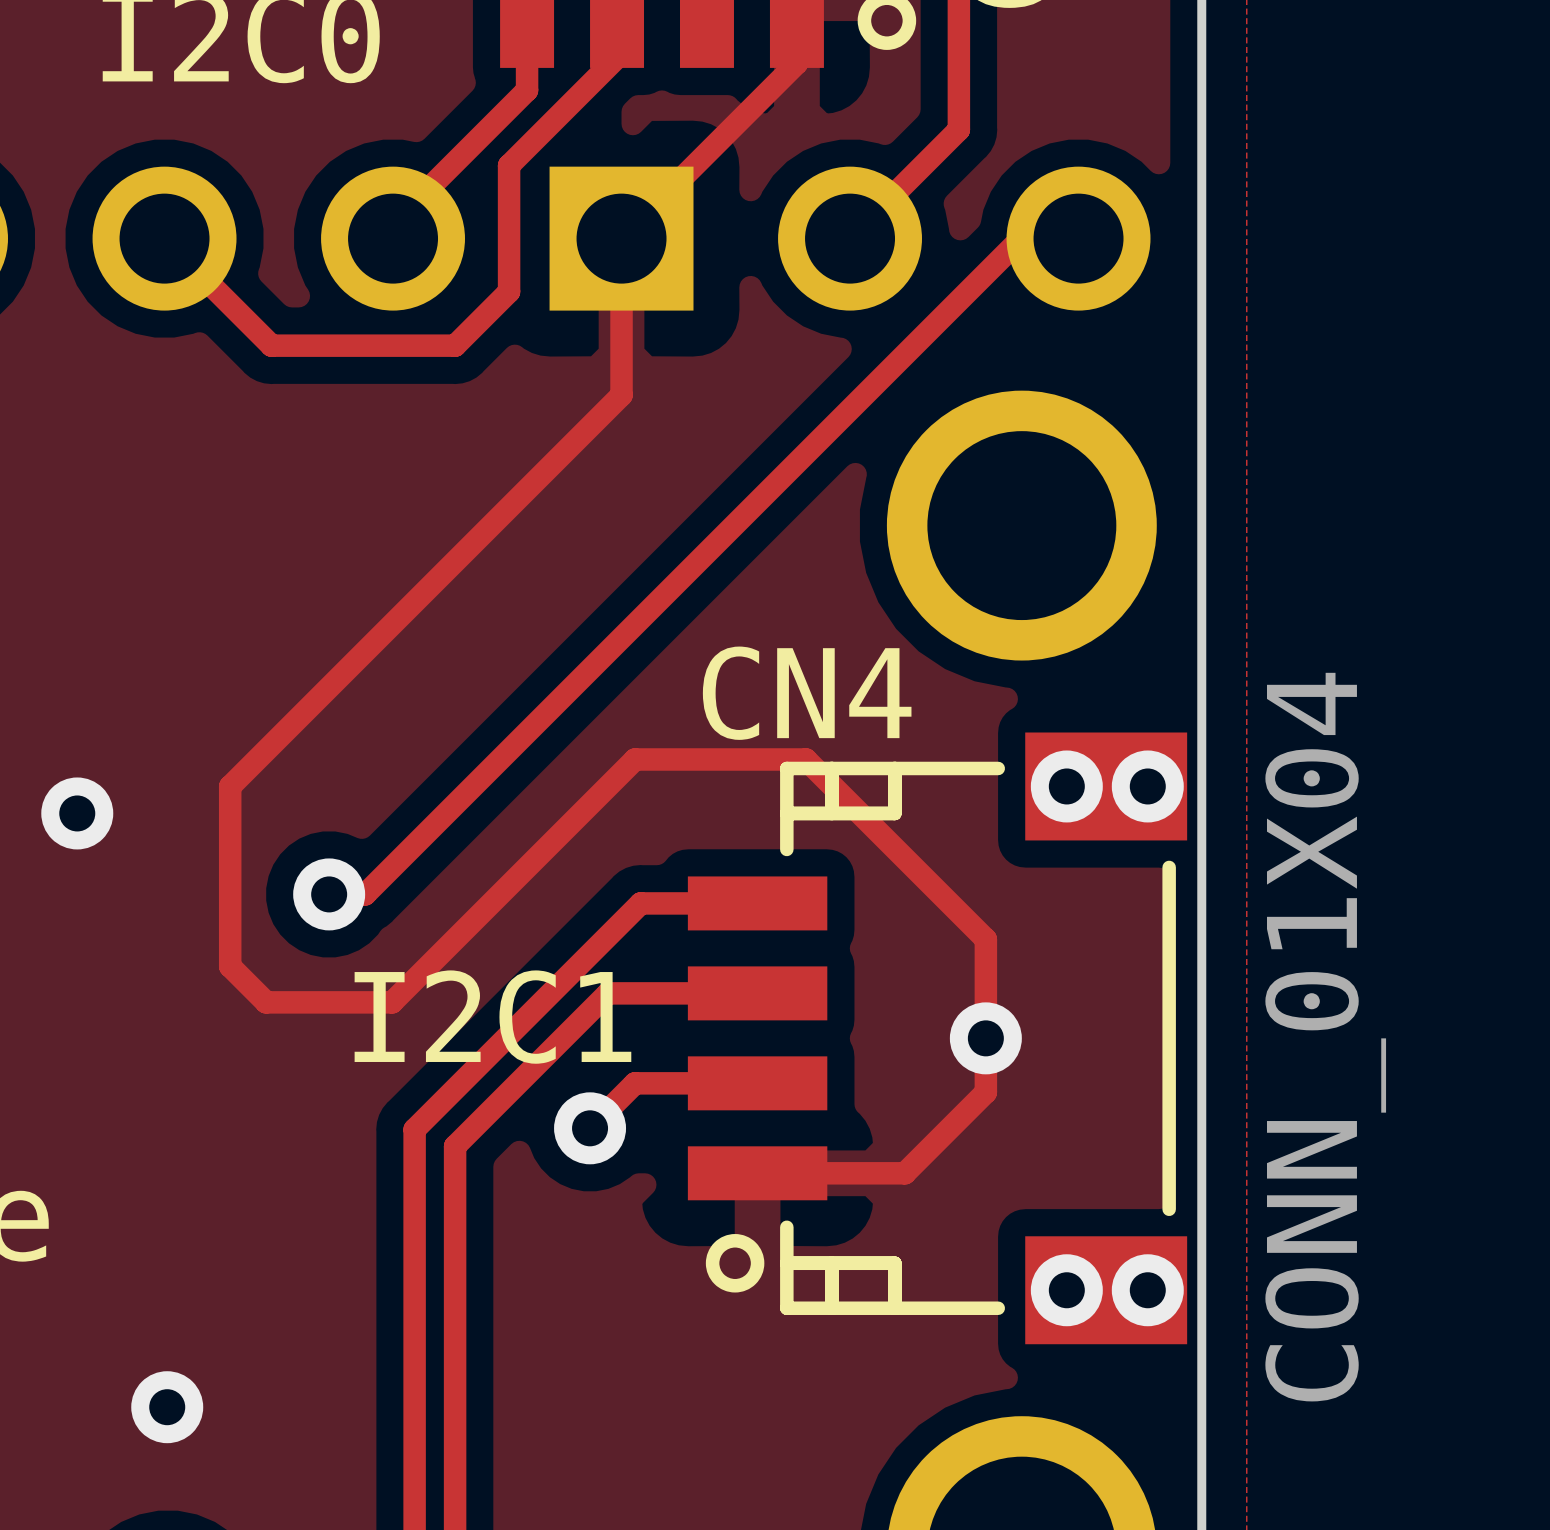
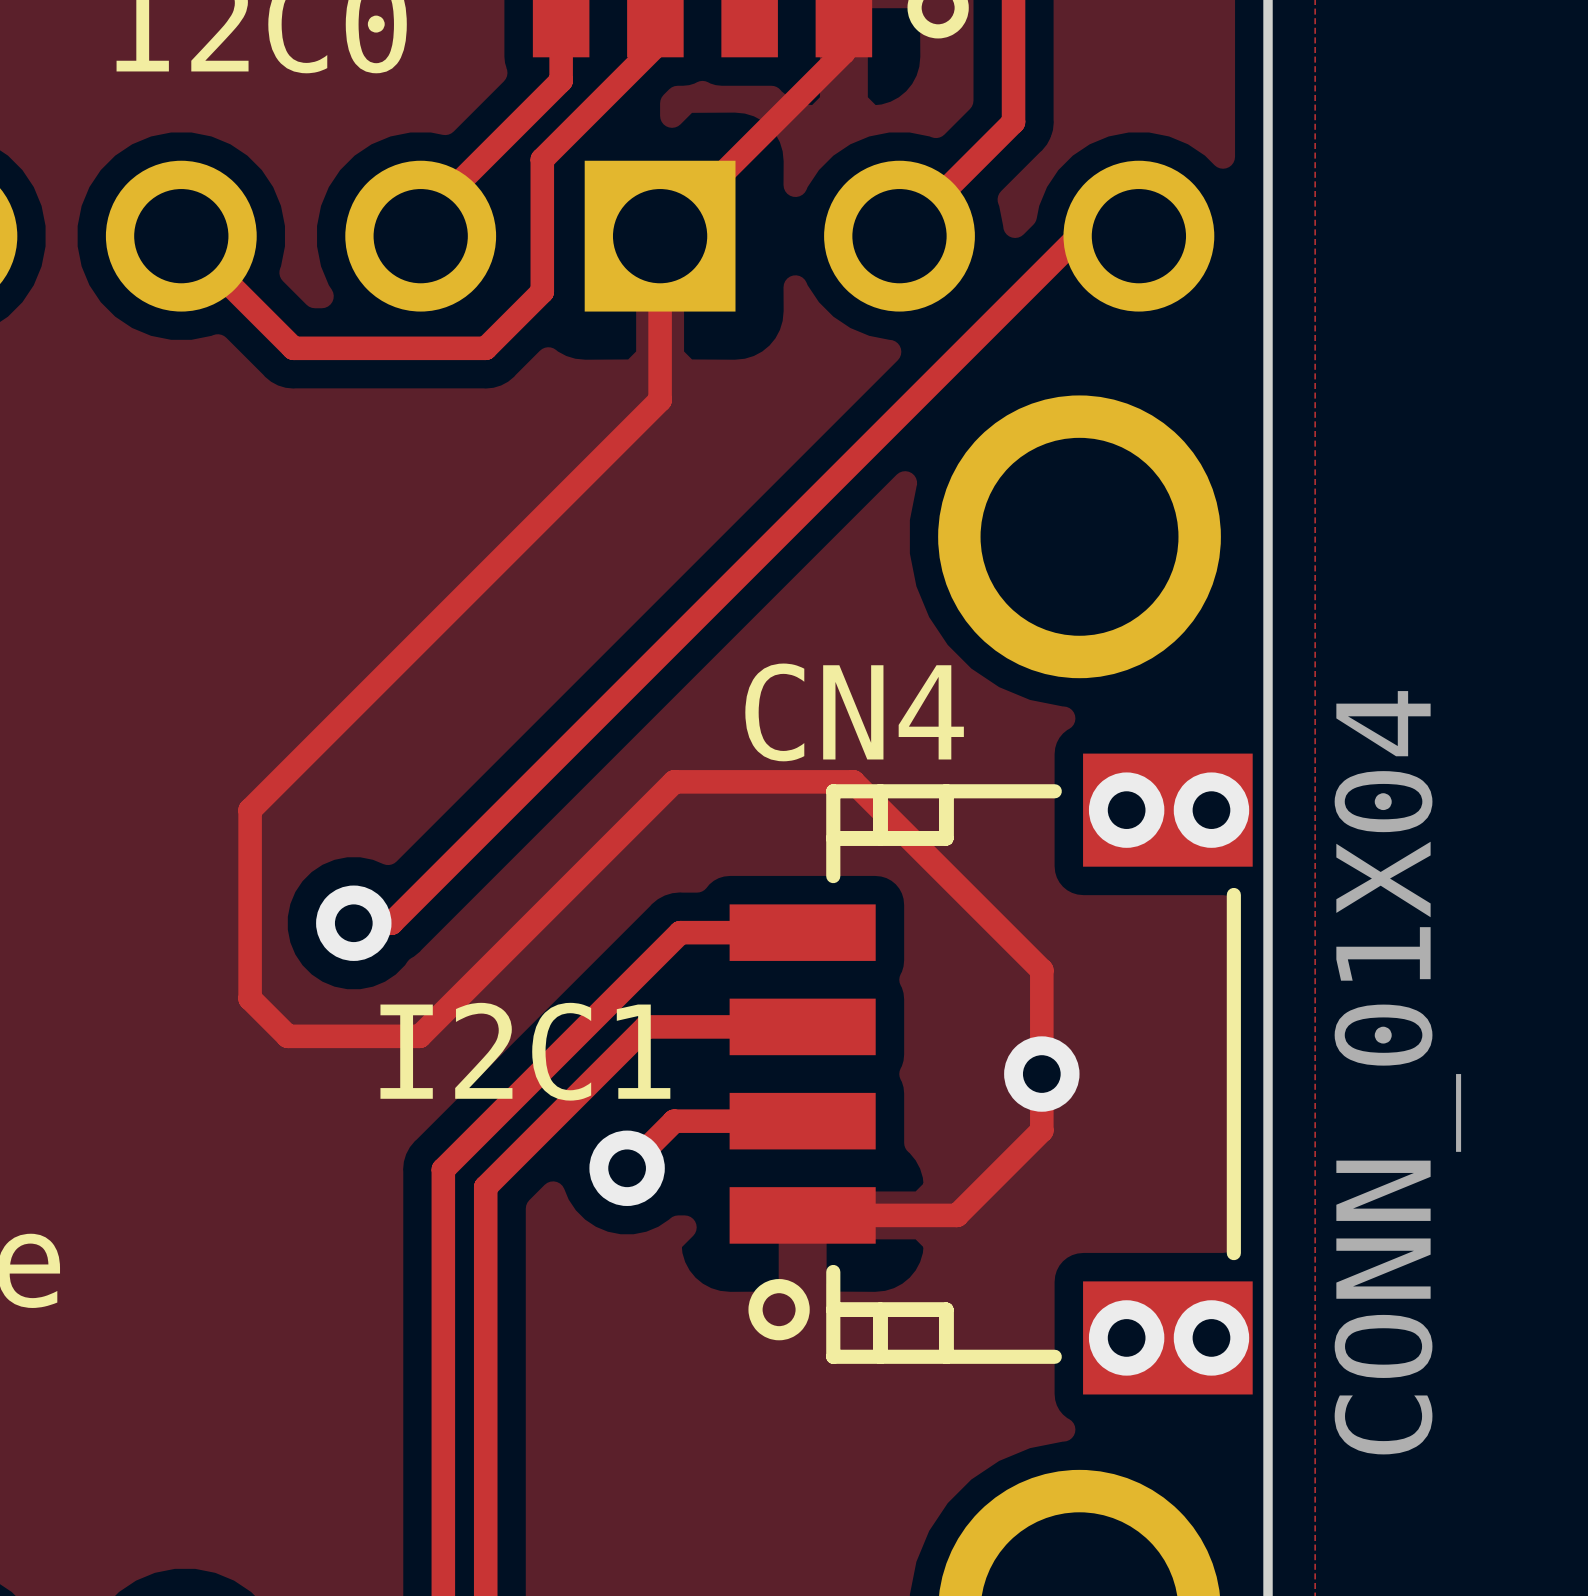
via: (77, 813) -> none
via: (167, 1407) -> none

